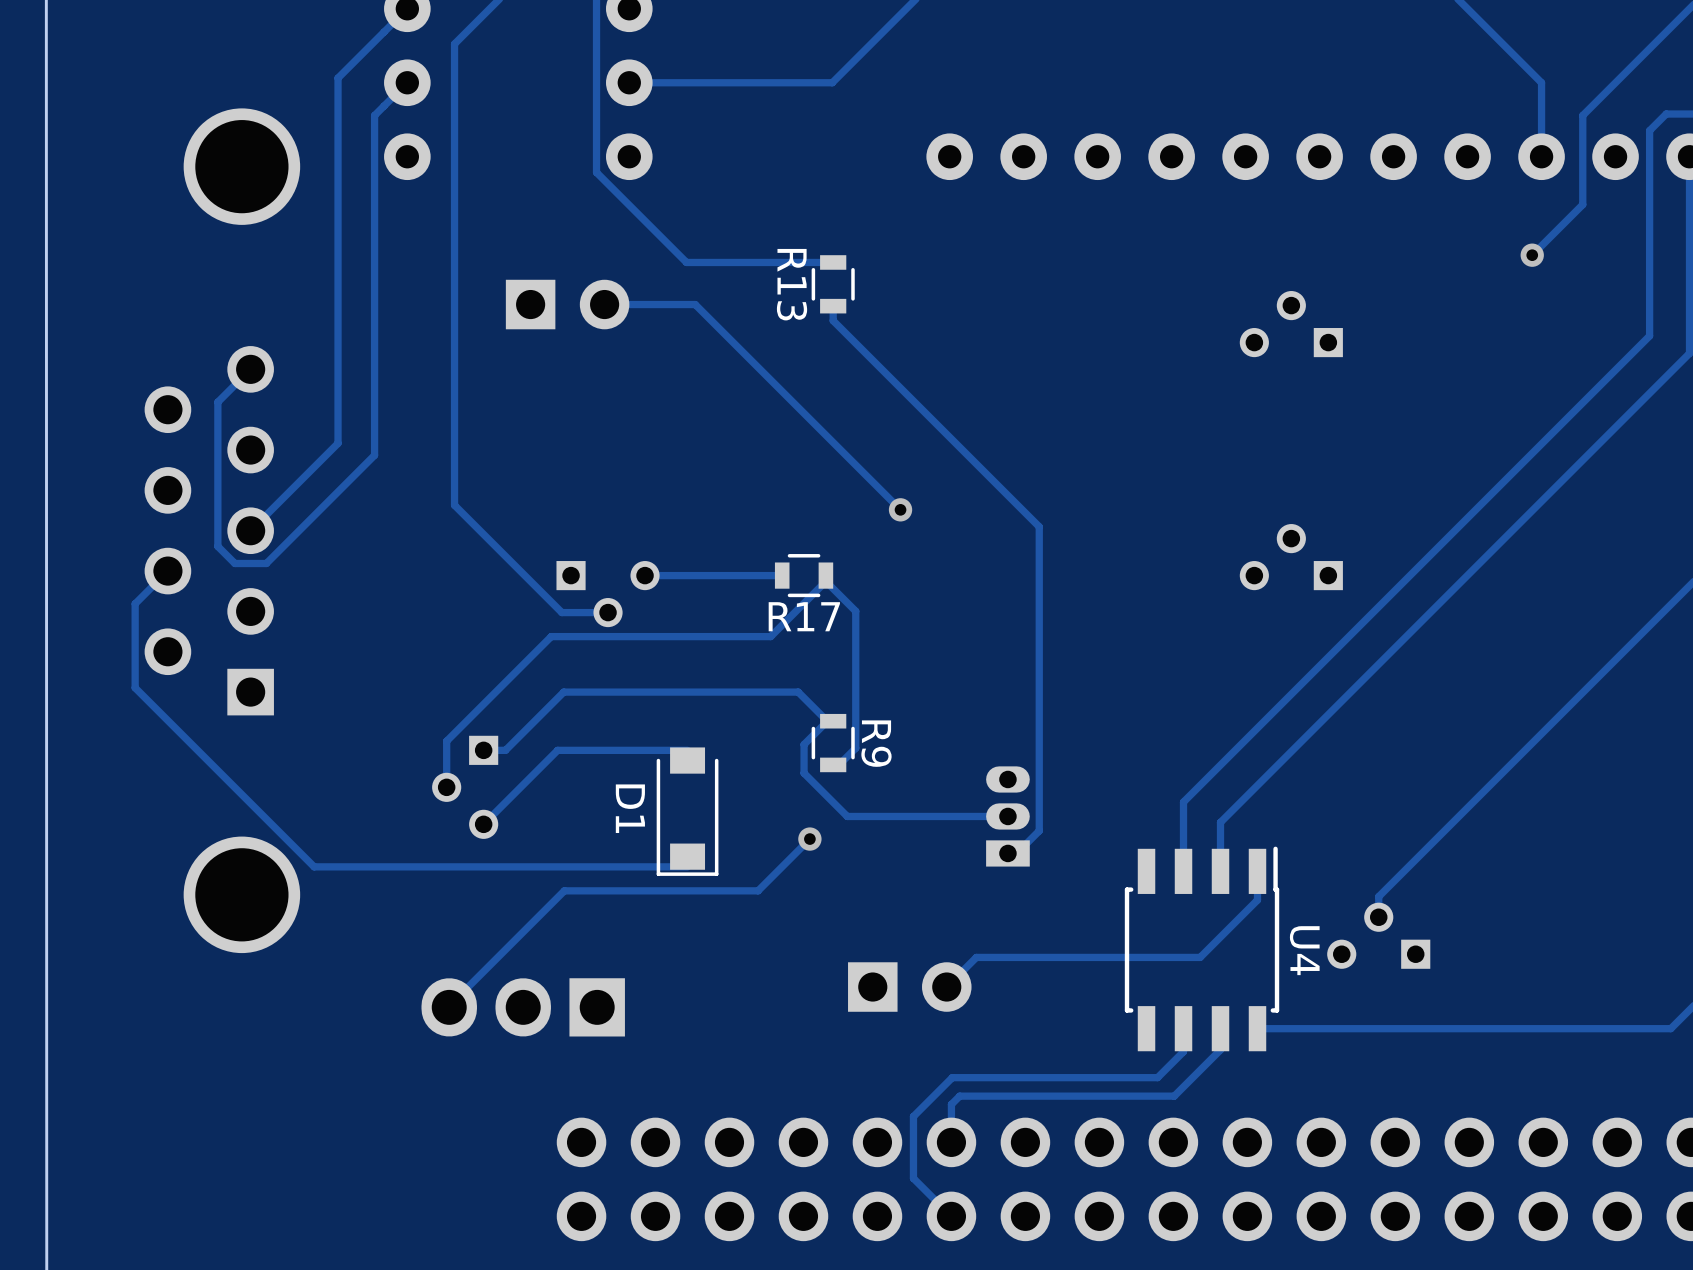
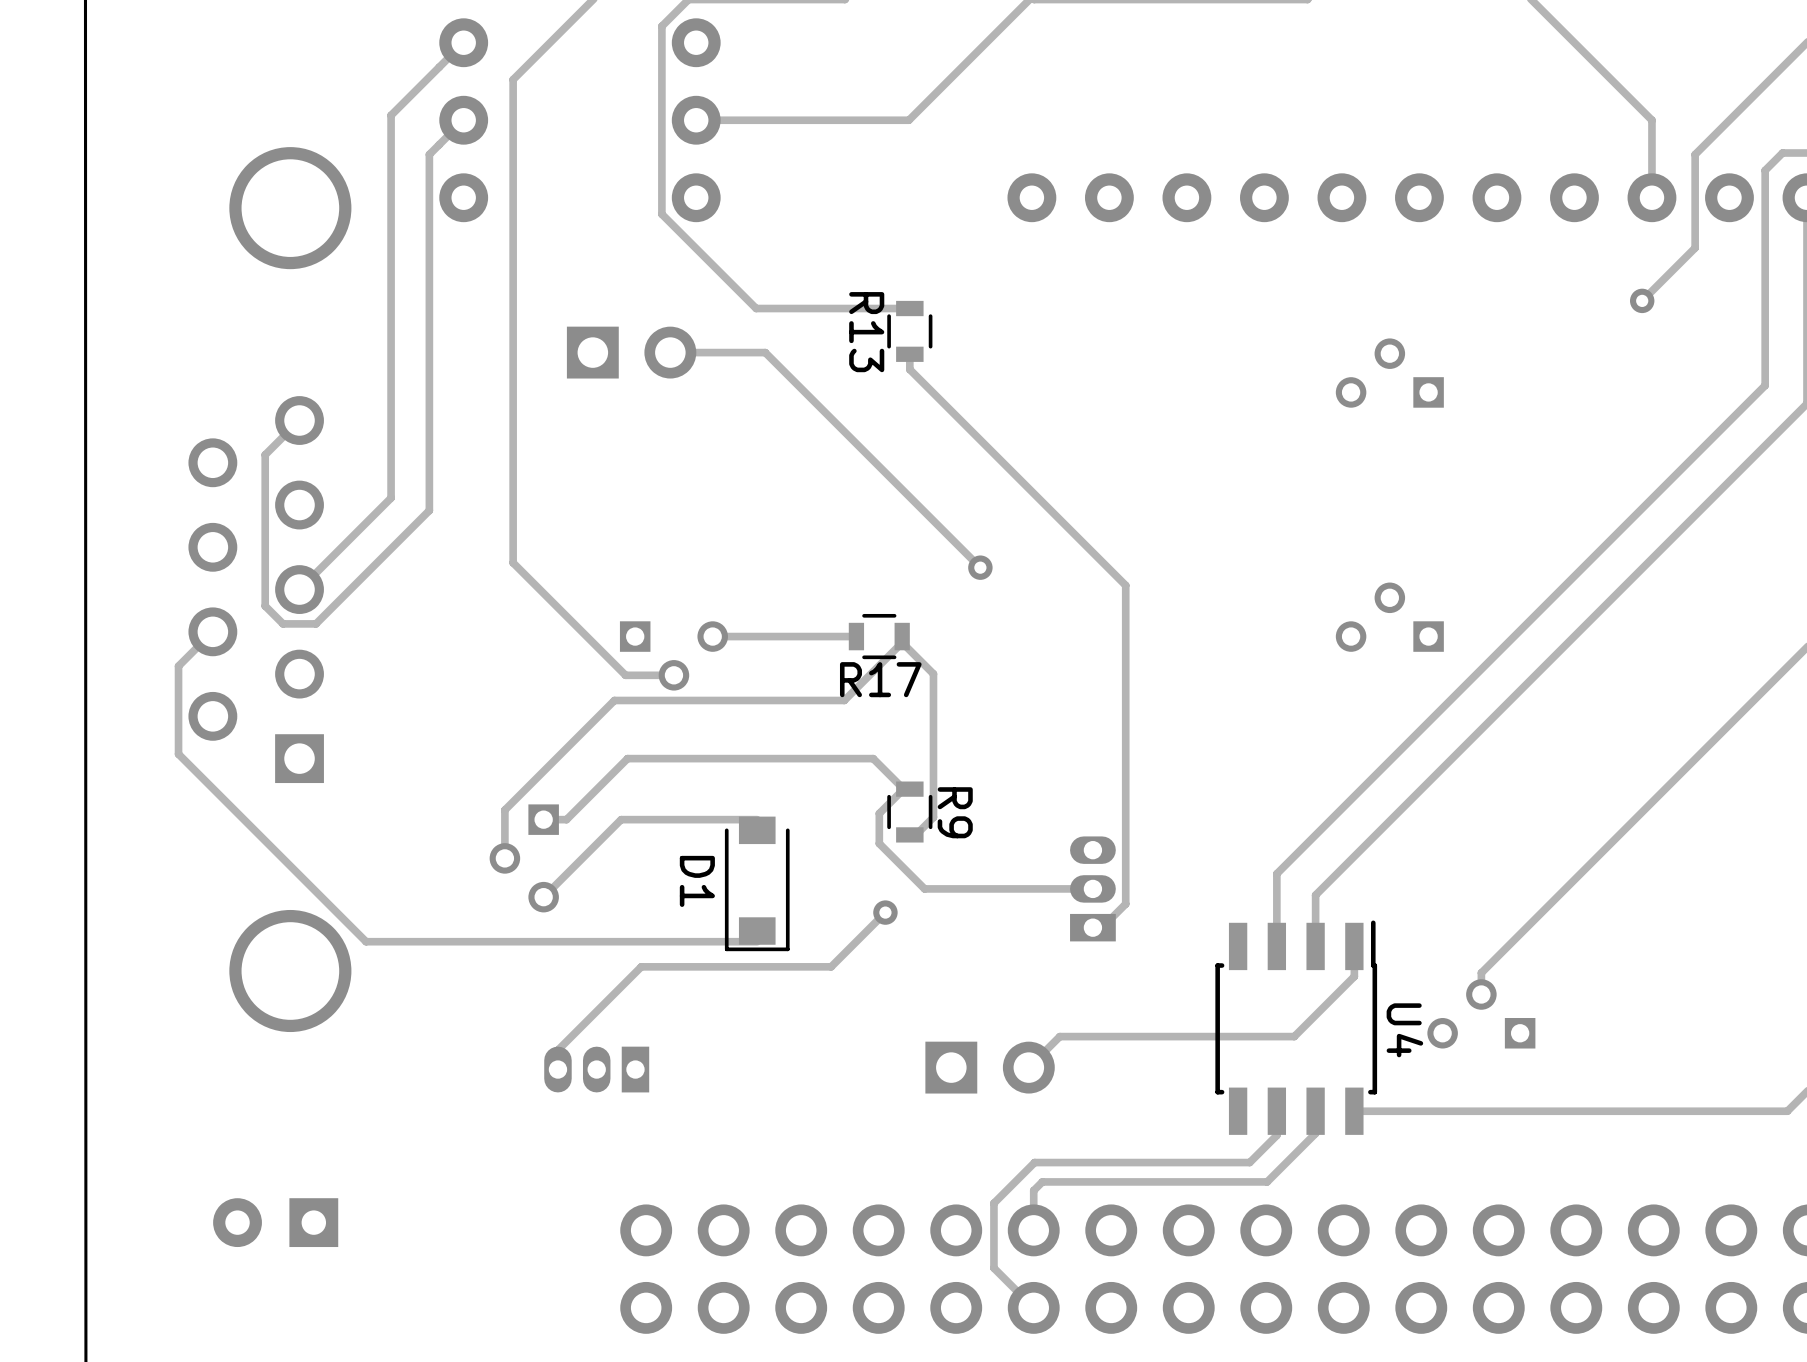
track: (576, 890) (564, 890) (449, 1007) -> (641, 966) (557, 1050) (557, 1069)
part footprint: [421, 978, 625, 1037] -> [544, 1046, 650, 1093]
part: none -> (275, 1222)

